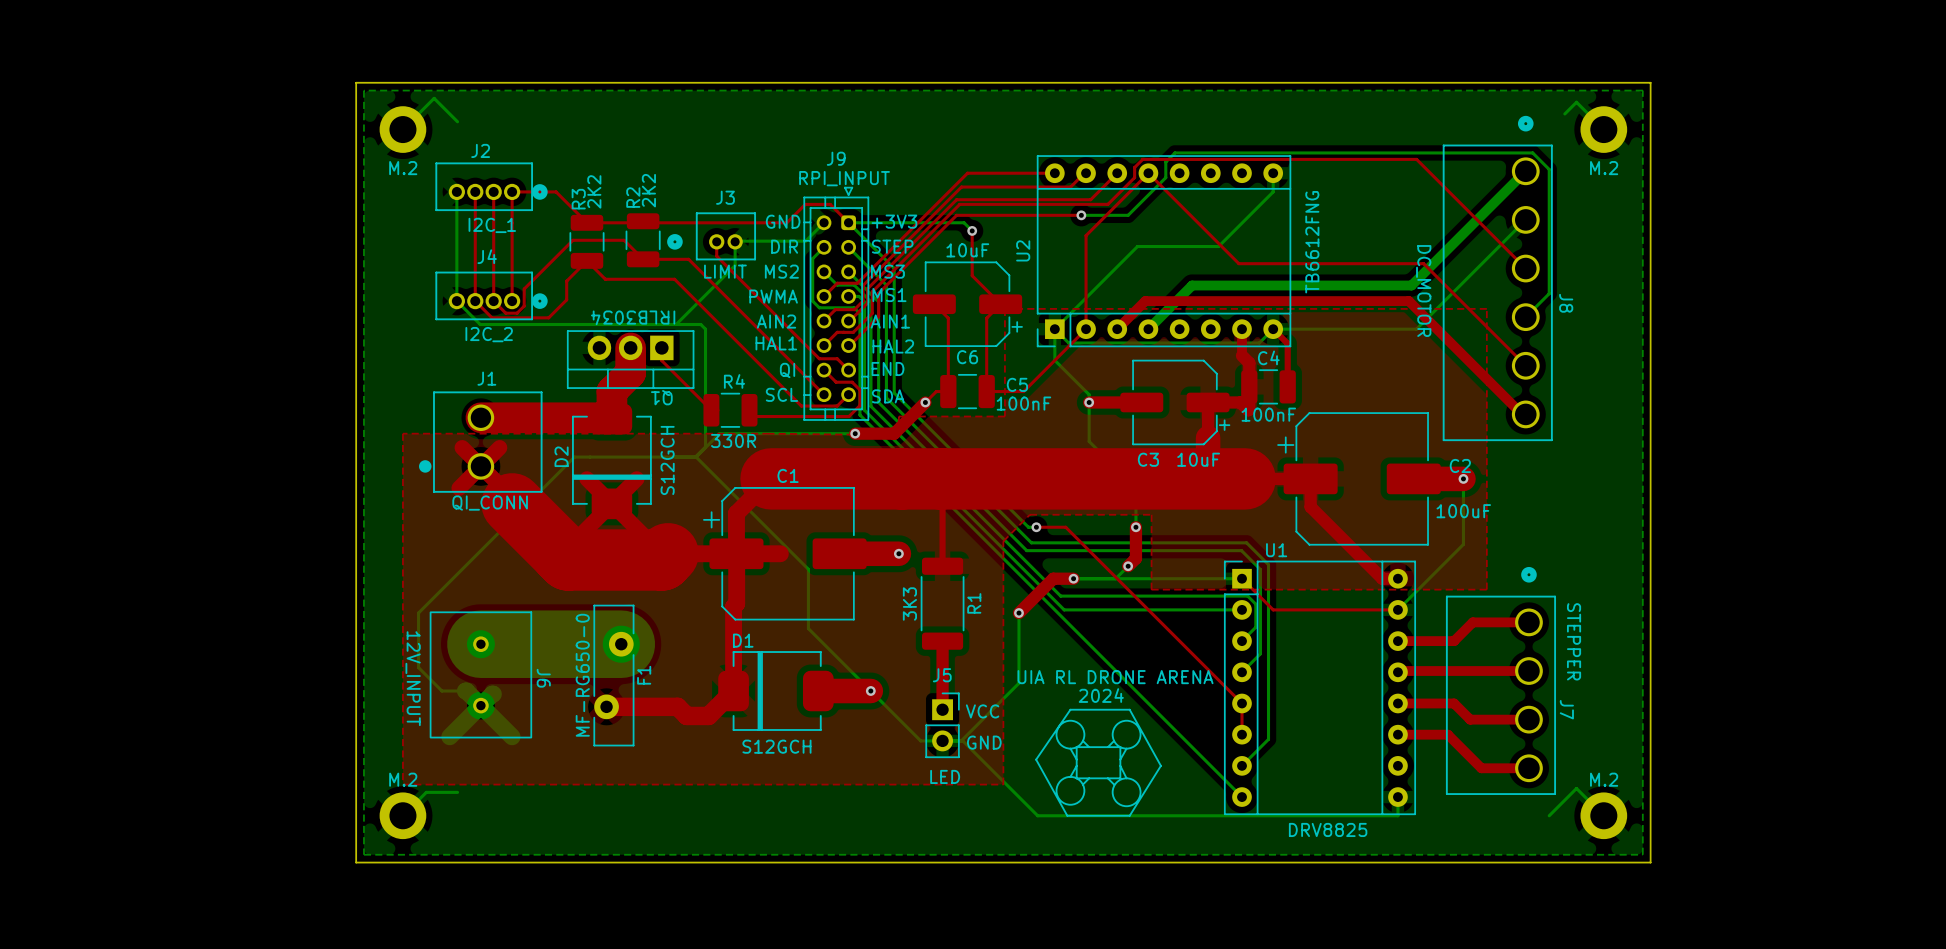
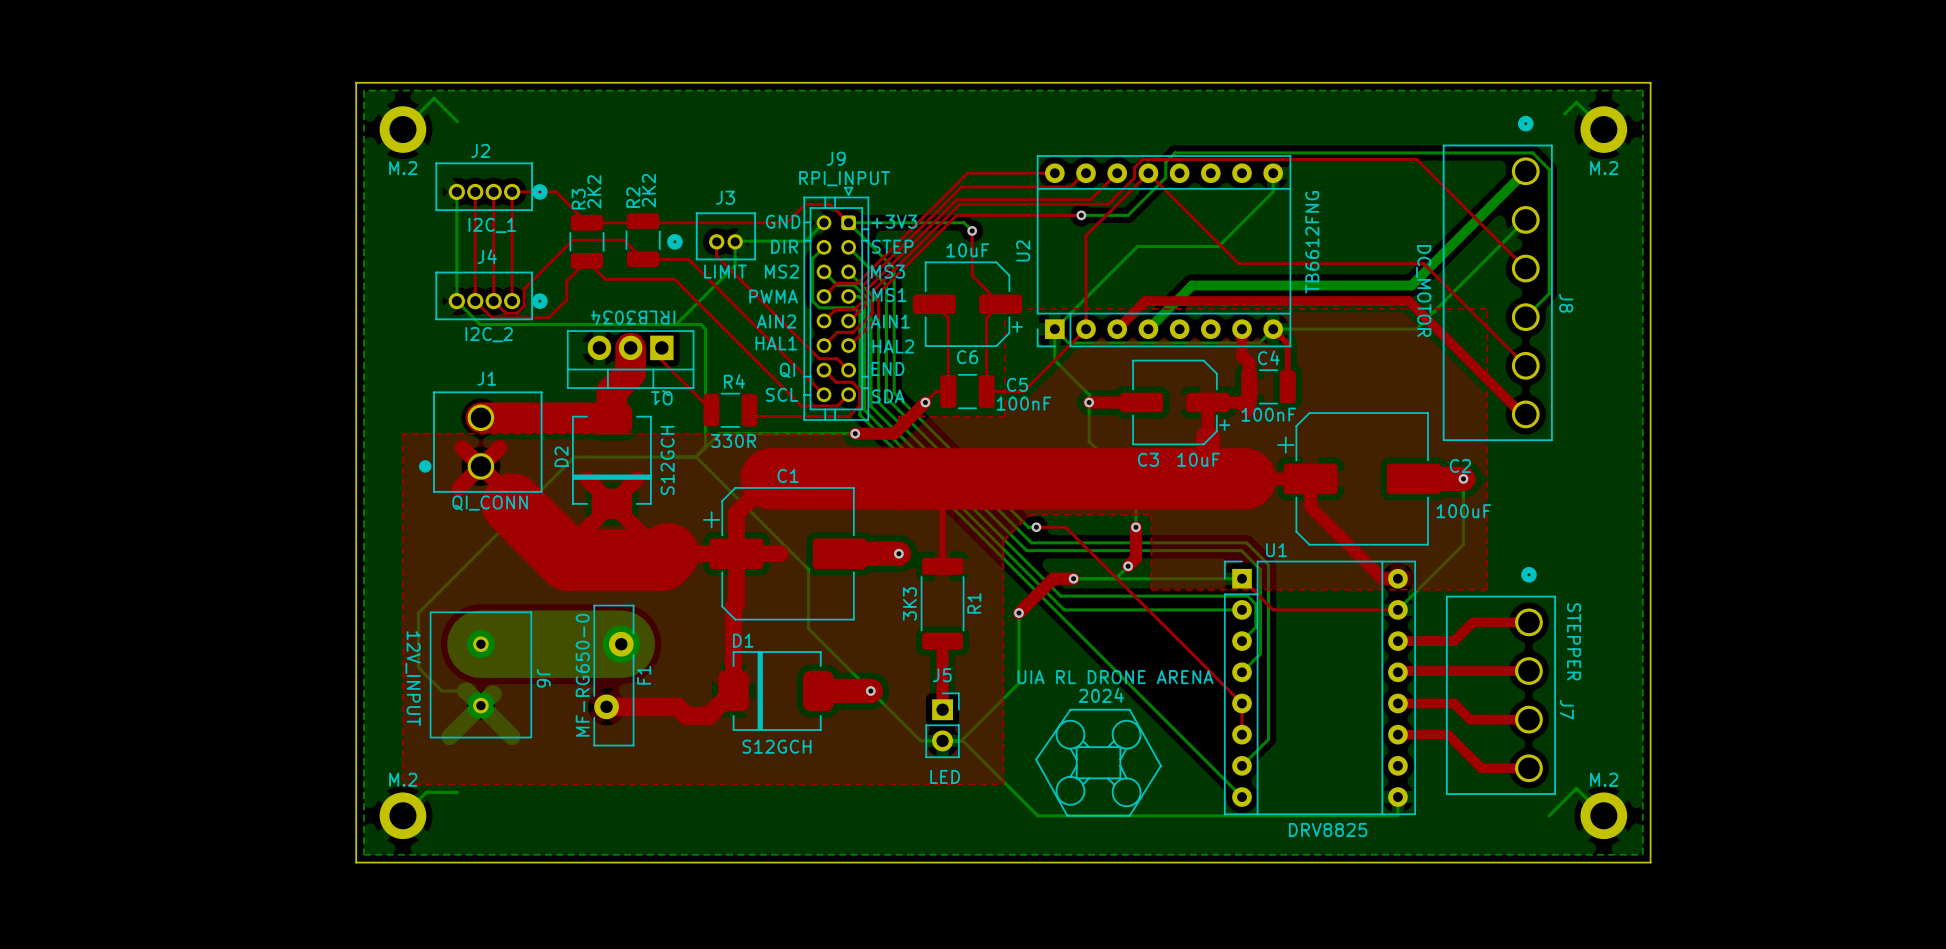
text: VCC (982, 711) -> none
text: GND (984, 742) -> none

